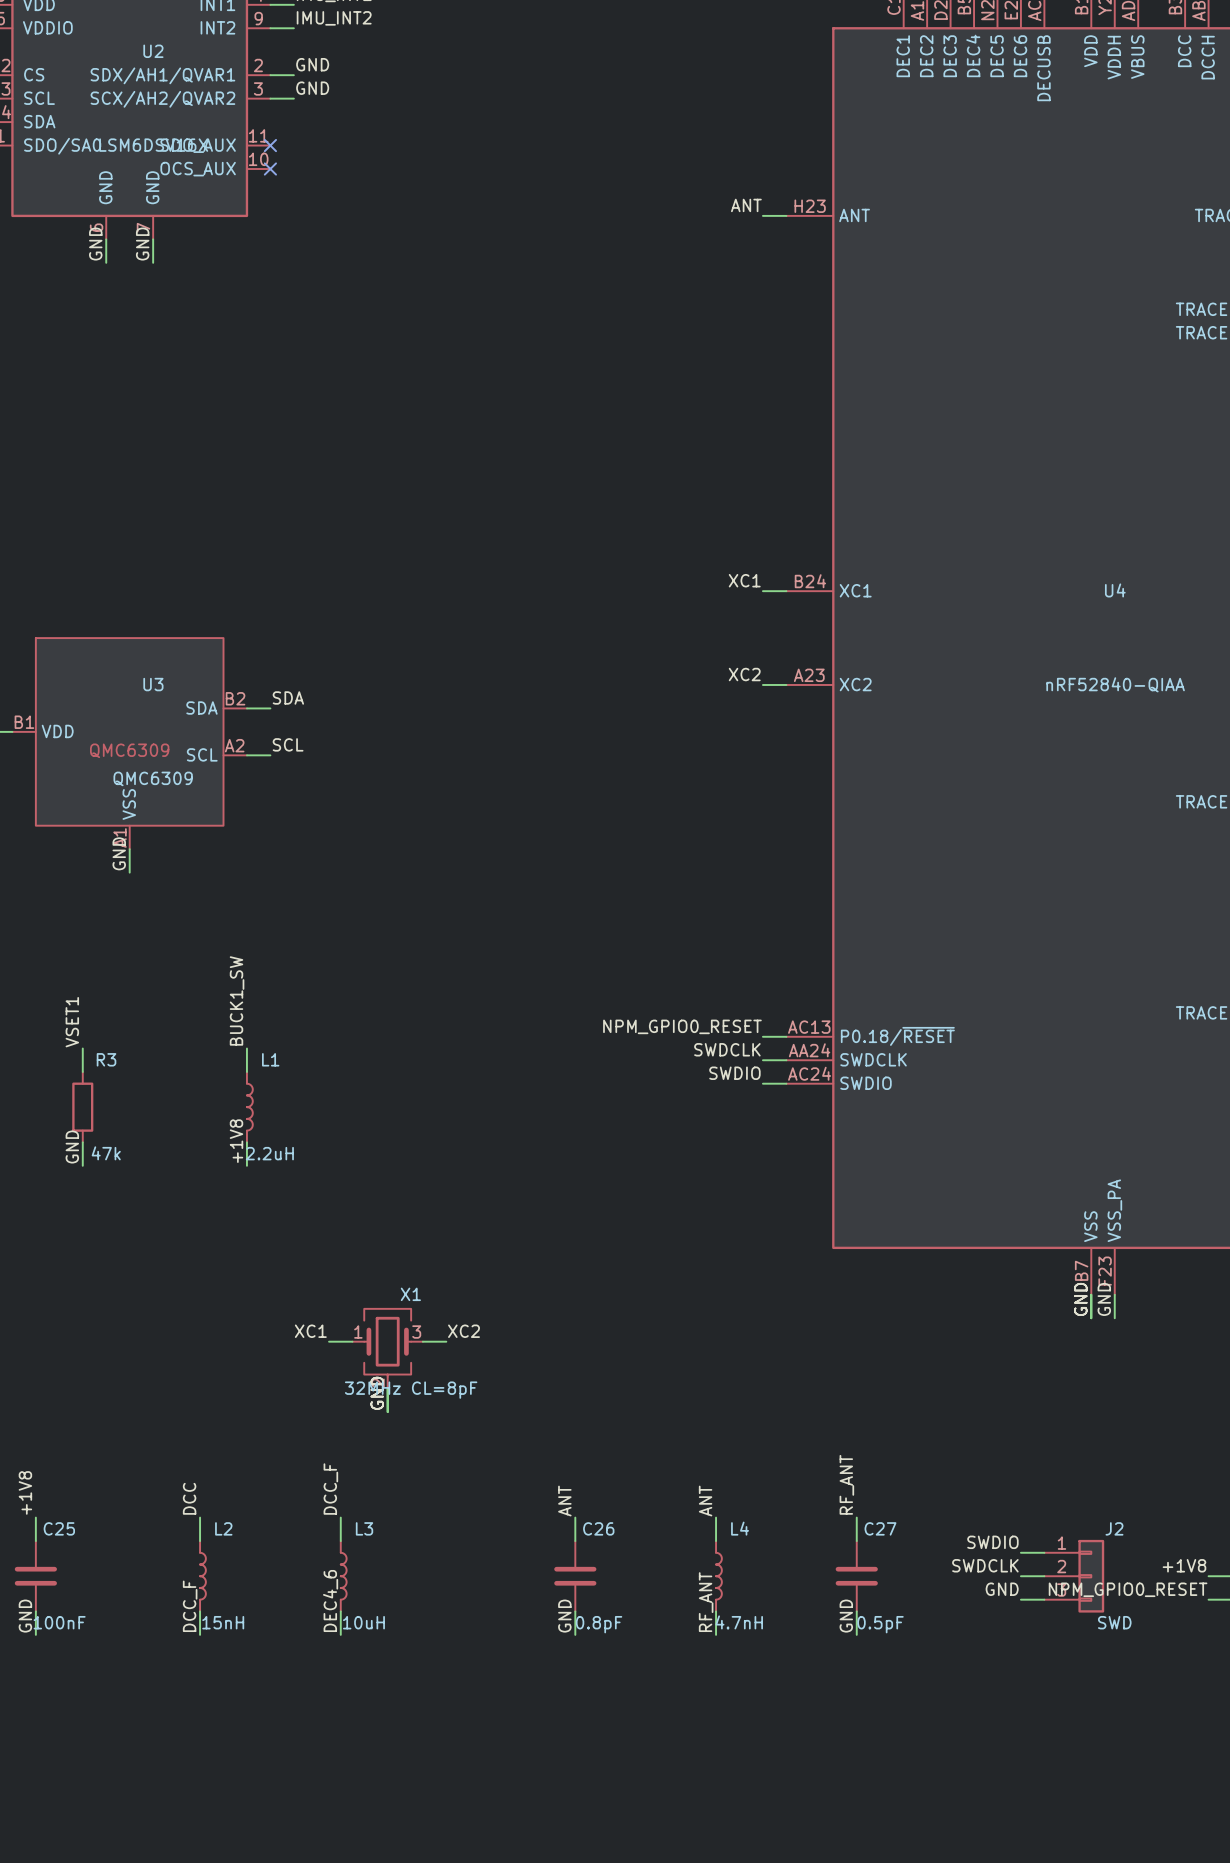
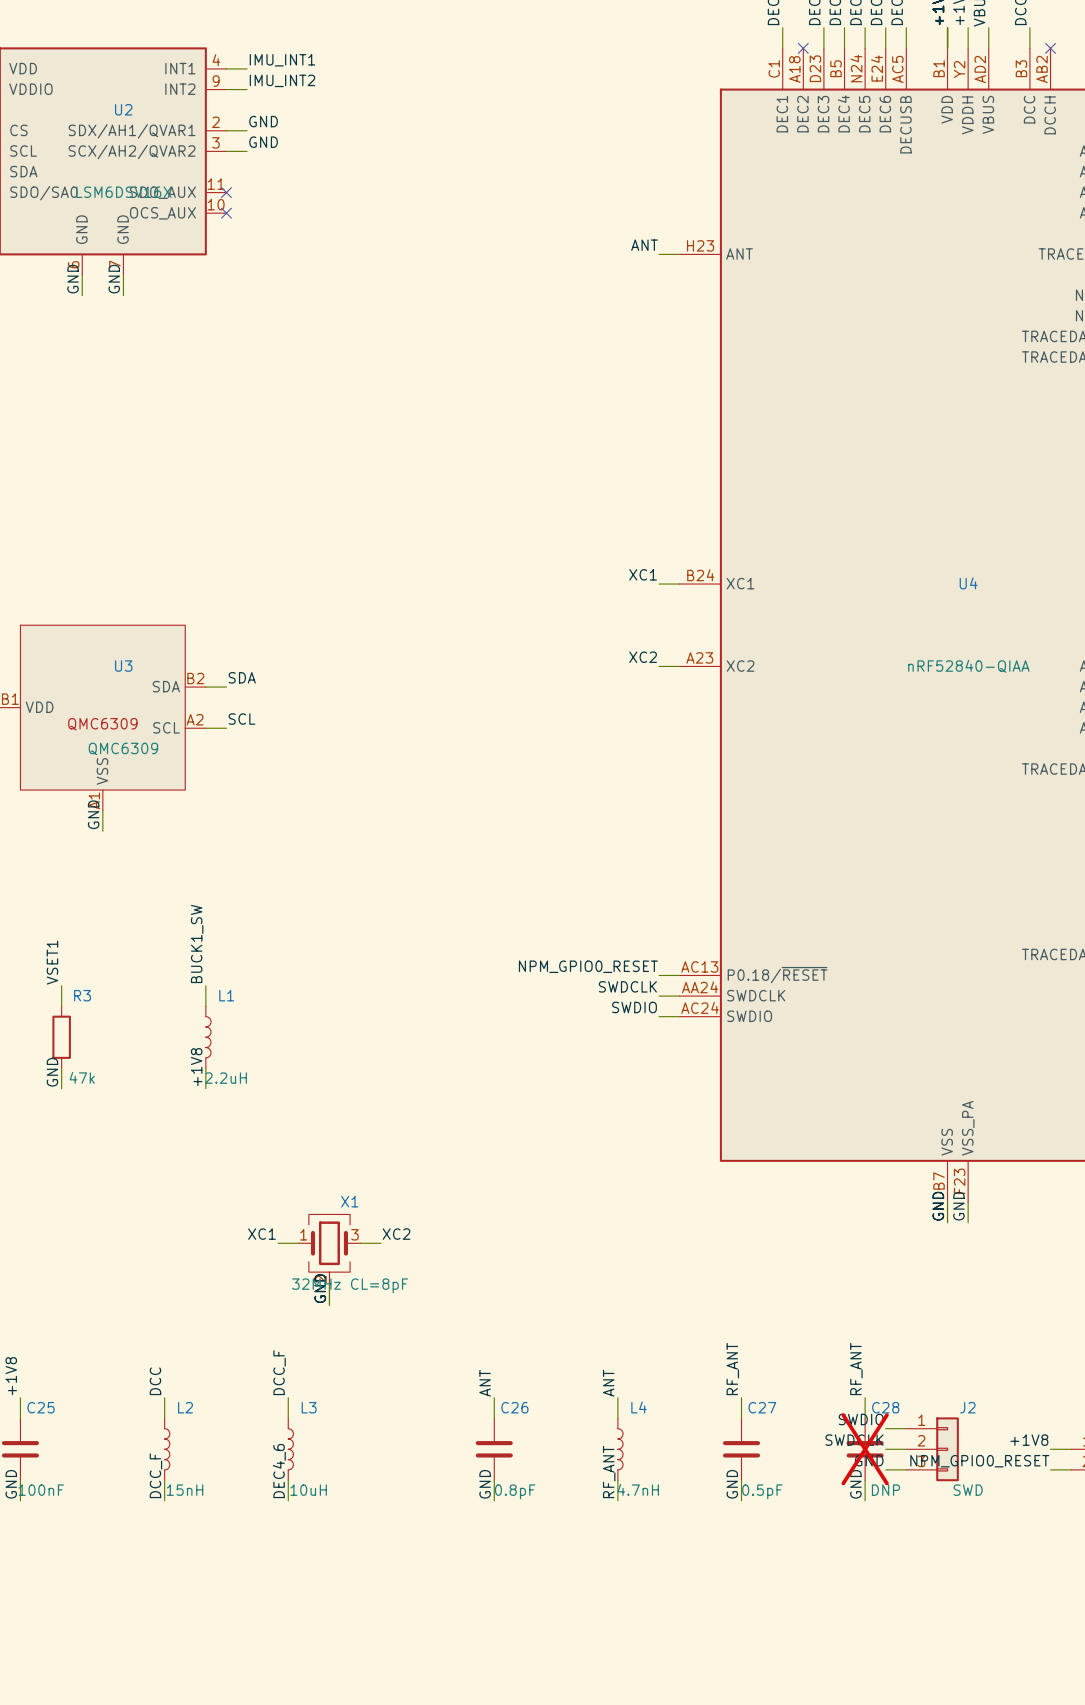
label: none -> RF_ANT (856, 1369)
wire: none -> (865, 1397) (865, 1418)
C28: none -> DNP (865, 1449)
wire: none -> (865, 1480) (865, 1500)
label: none -> GND (855, 1484)

